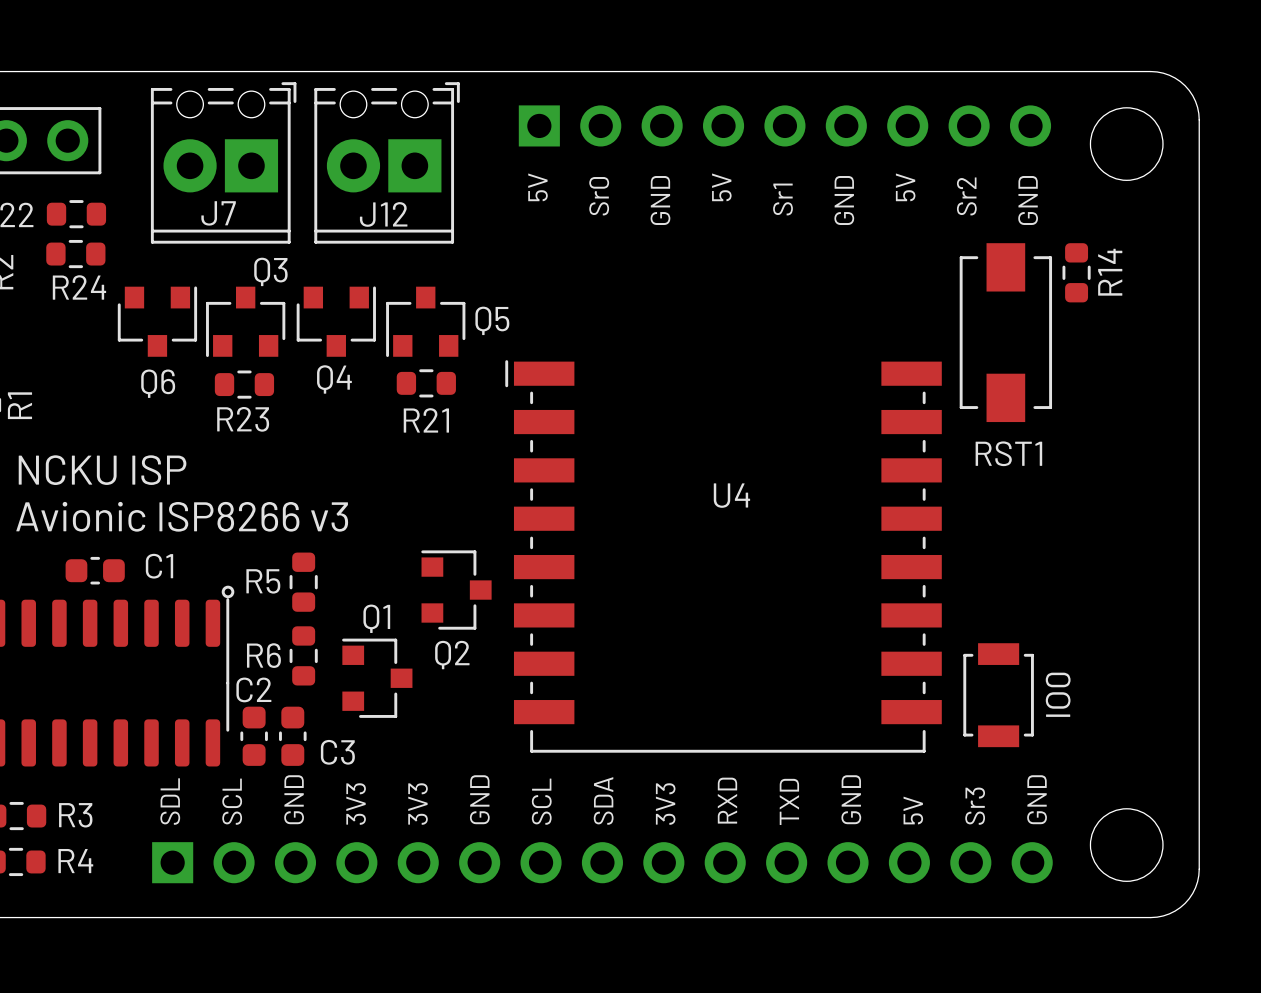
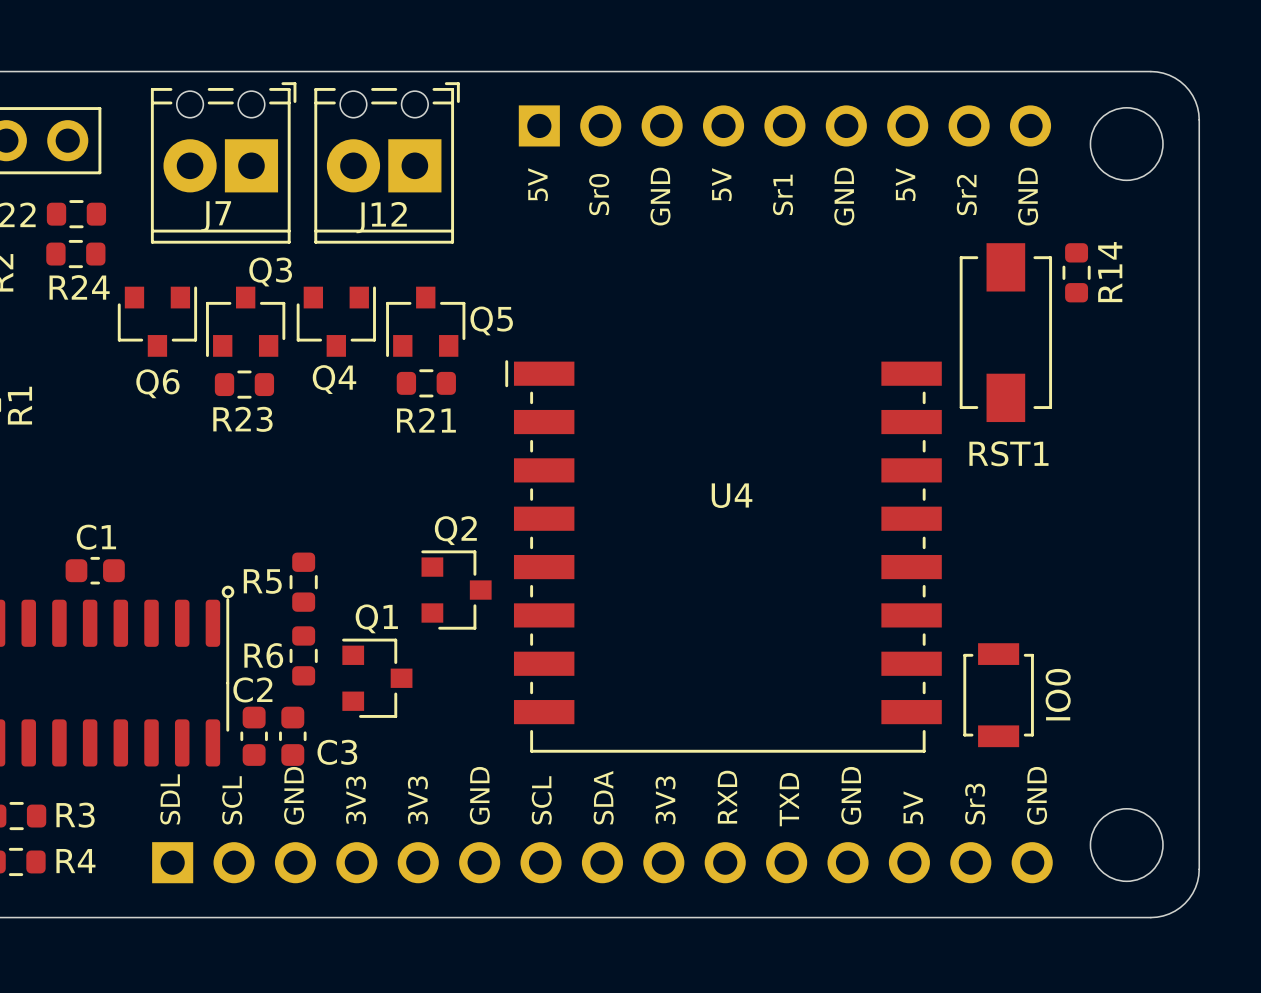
text: NCKU ISP (102, 470) -> none
text: Avionic ISP8266 v3 (182, 516) -> none
C1 name position: C1 (159, 566) -> C1 (96, 537)
Q2 name position: Q2 (452, 655) -> Q2 (455, 530)

